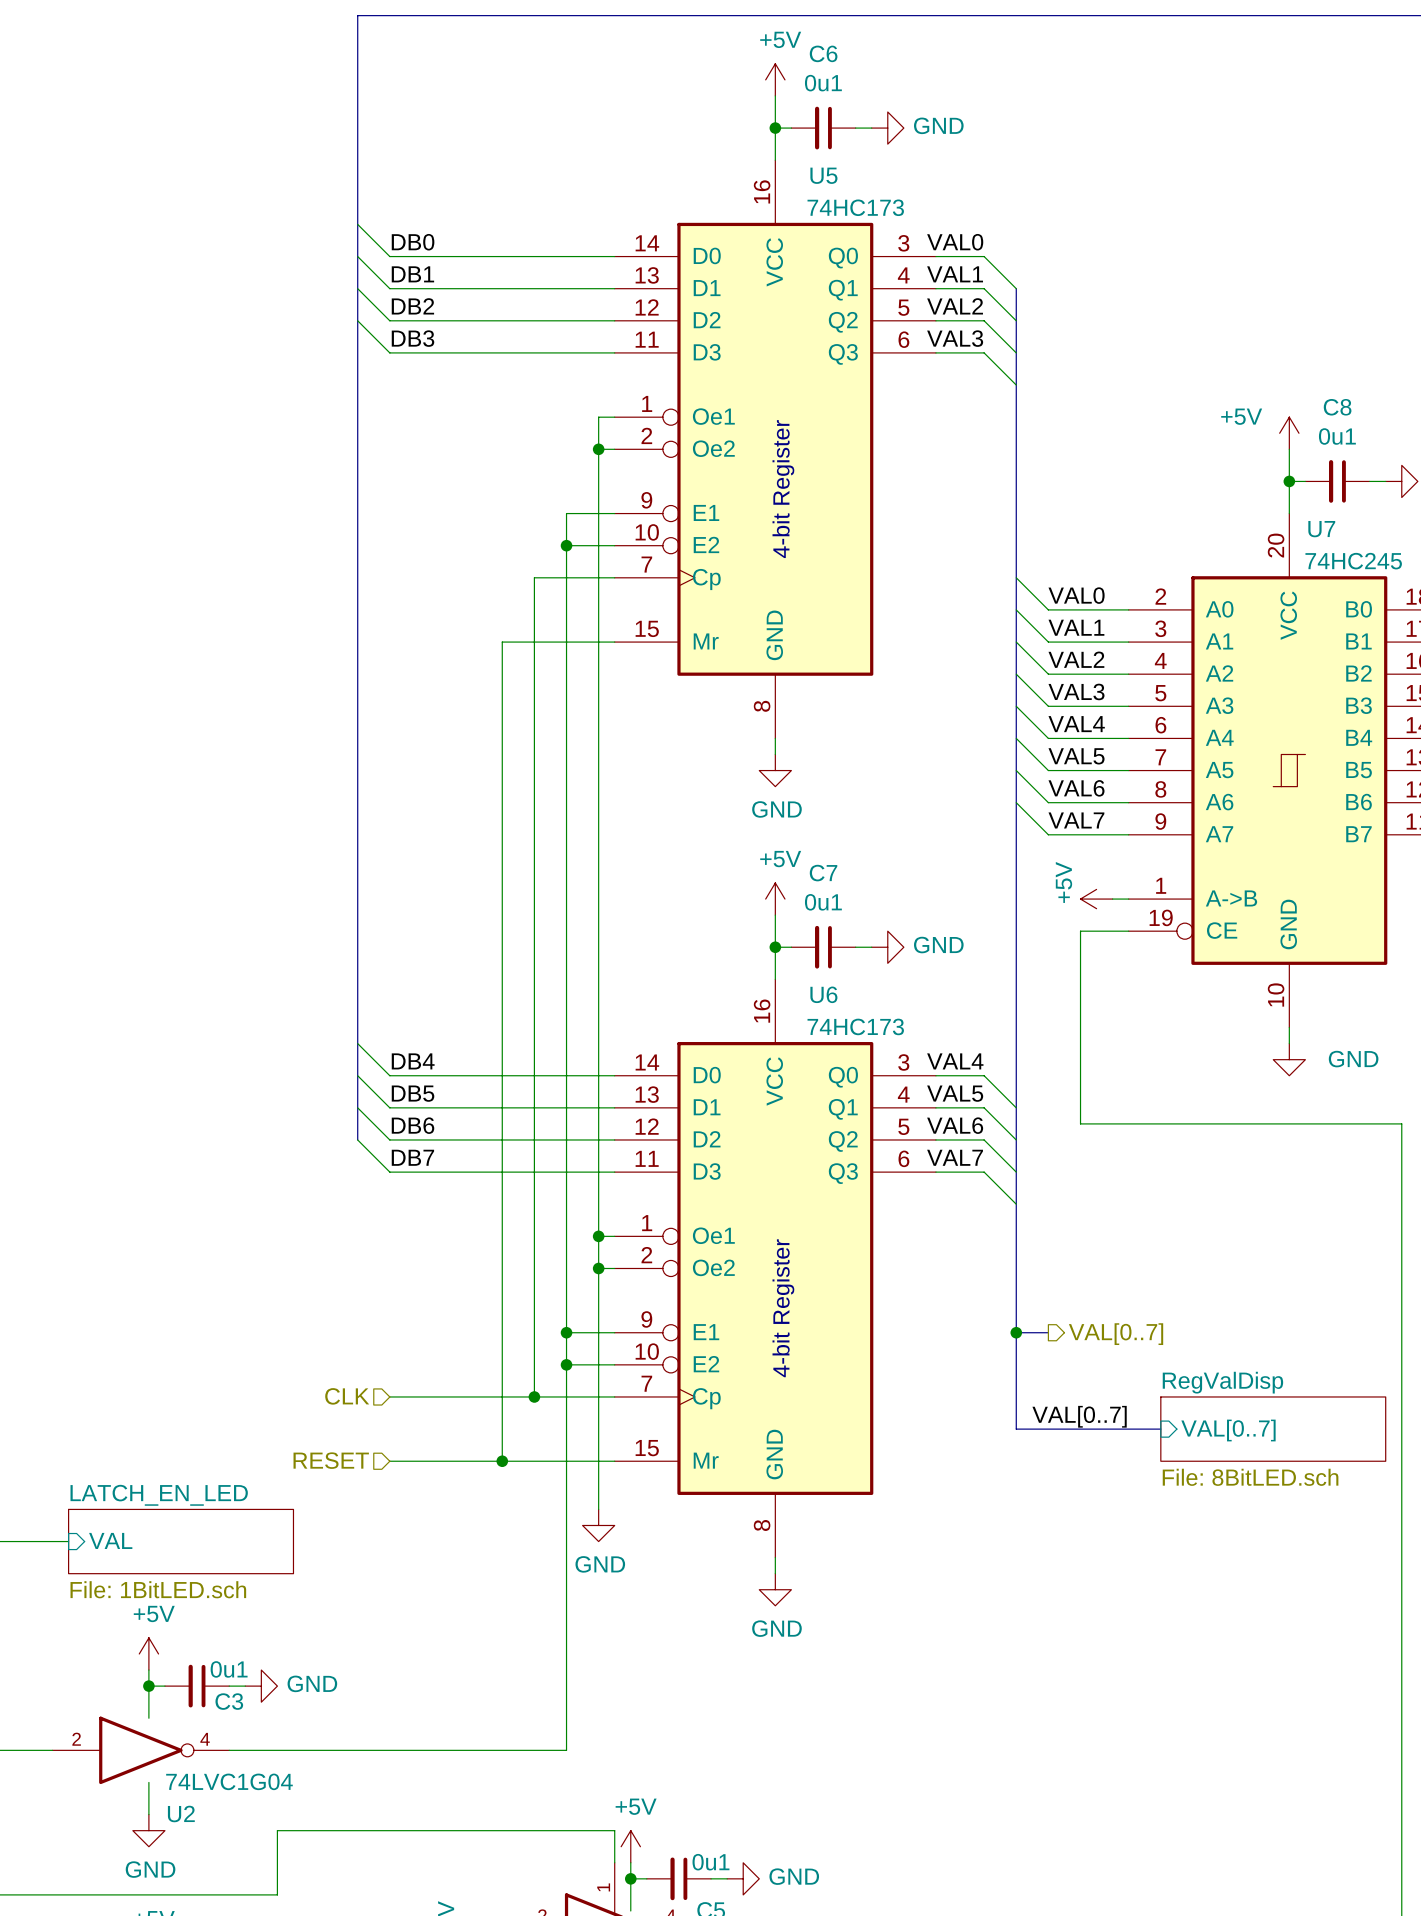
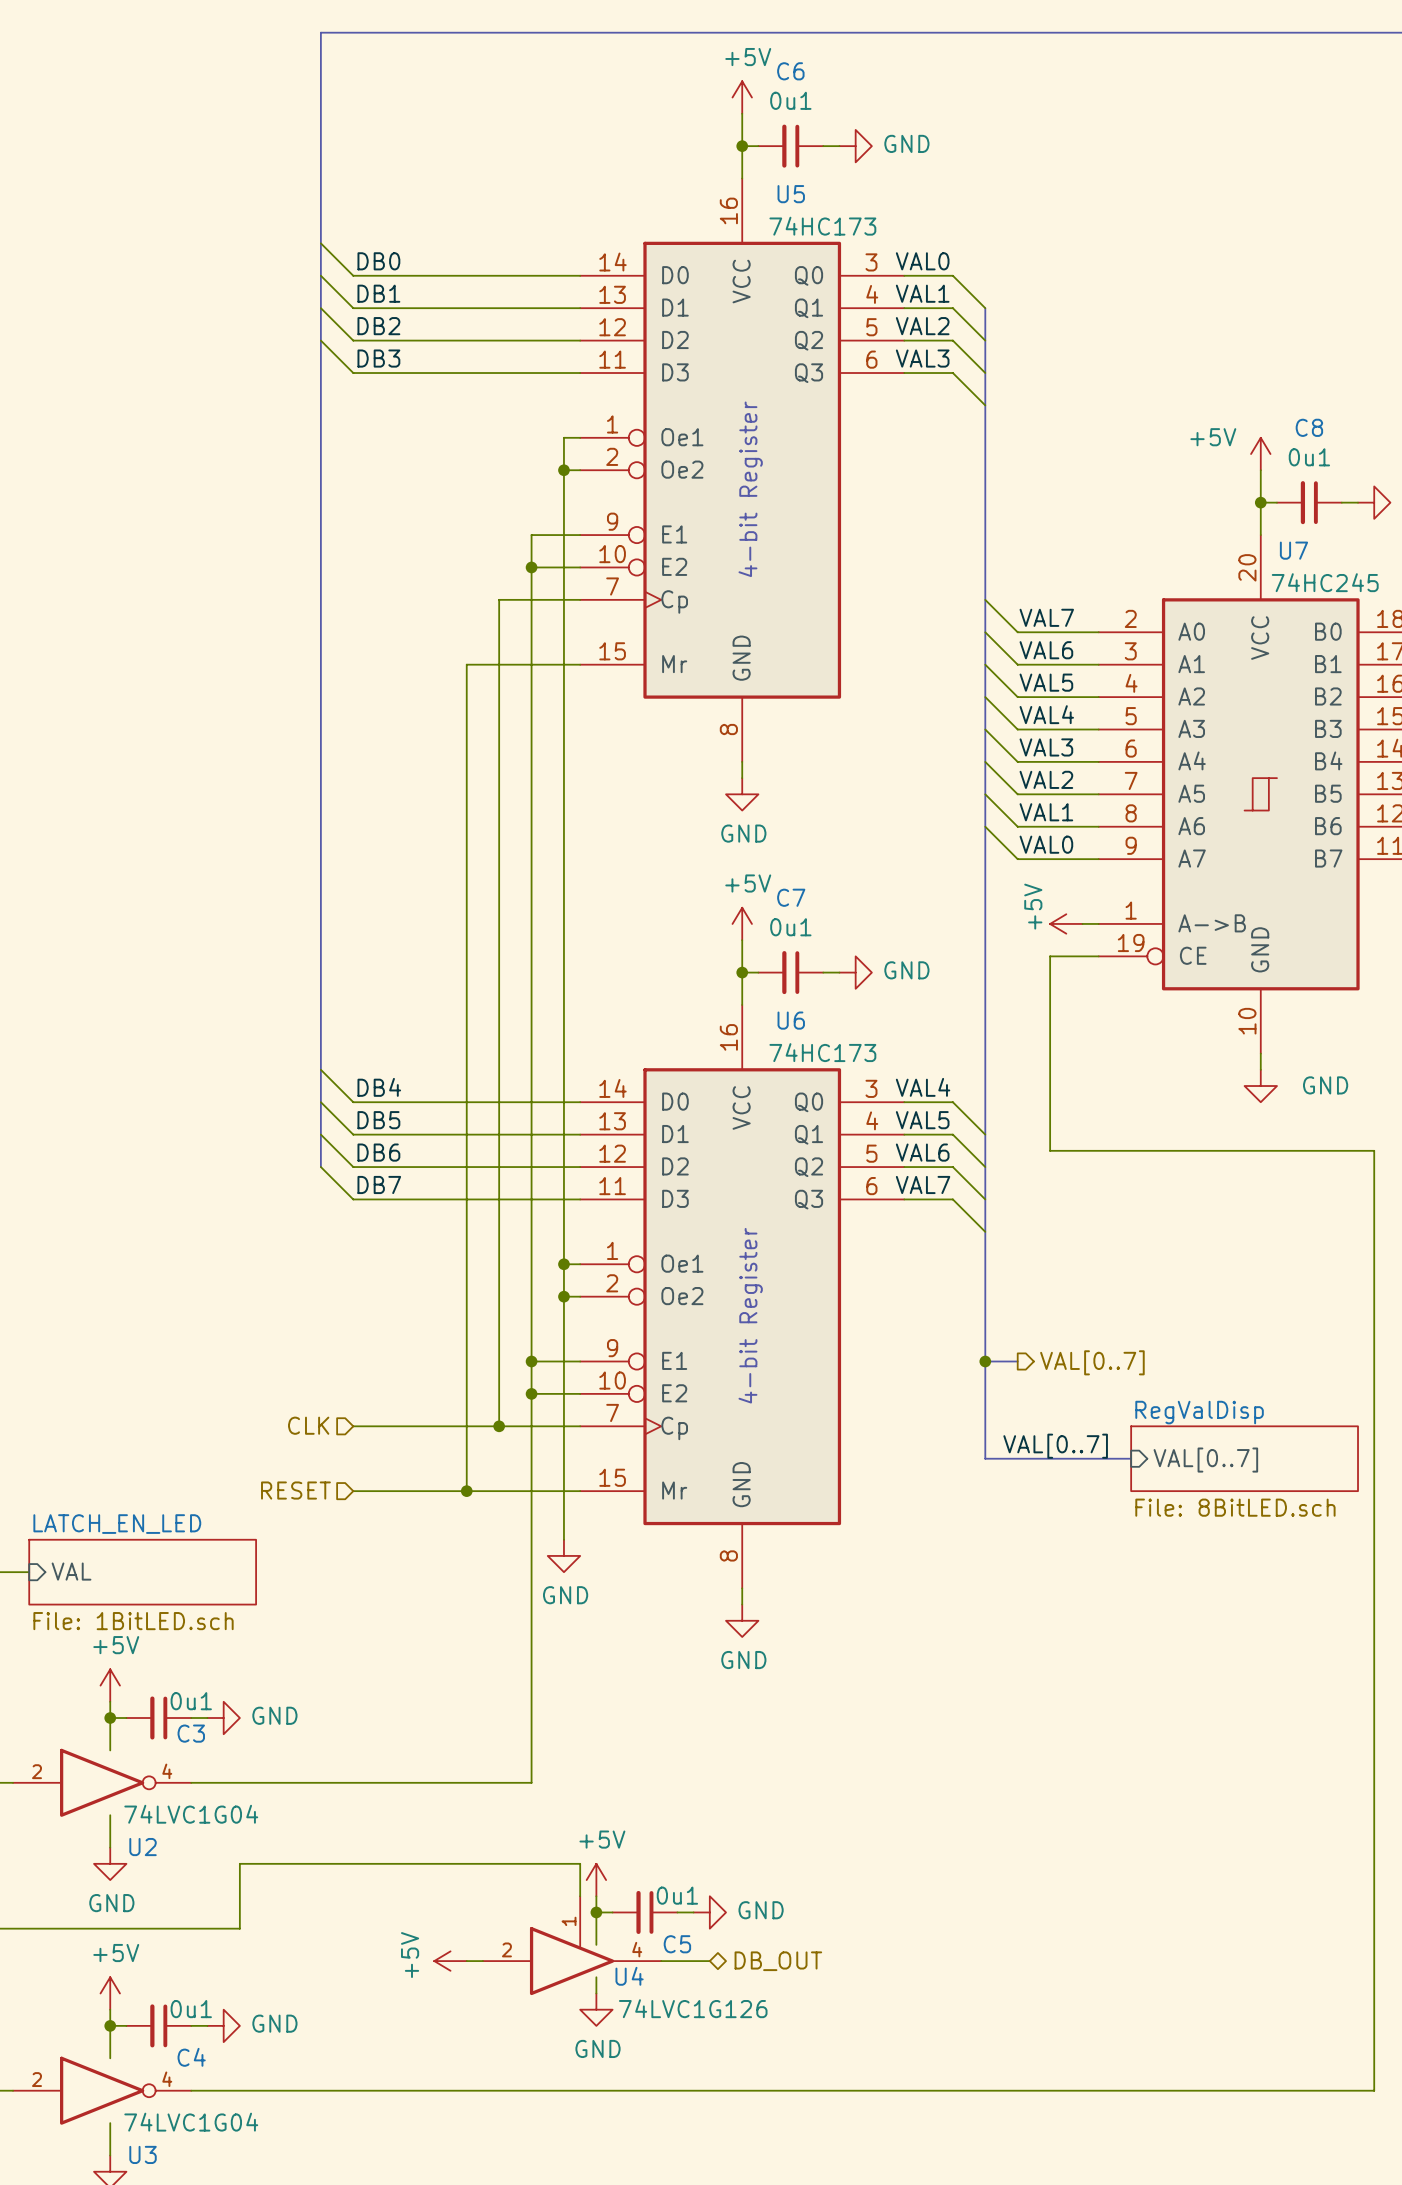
label: VAL0 (1076, 595) -> VAL7 (1046, 617)
label: VAL1 (1076, 627) -> VAL6 (1046, 650)
label: VAL2 (1076, 659) -> VAL5 (1046, 682)
label: VAL3 (1076, 691) -> VAL4 (1046, 714)
label: VAL4 (1076, 724) -> VAL3 (1046, 747)
label: VAL5 (1076, 756) -> VAL2 (1046, 779)
label: VAL6 (1076, 788) -> VAL1 (1046, 812)
label: VAL7 (1076, 820) -> VAL0 (1046, 844)

